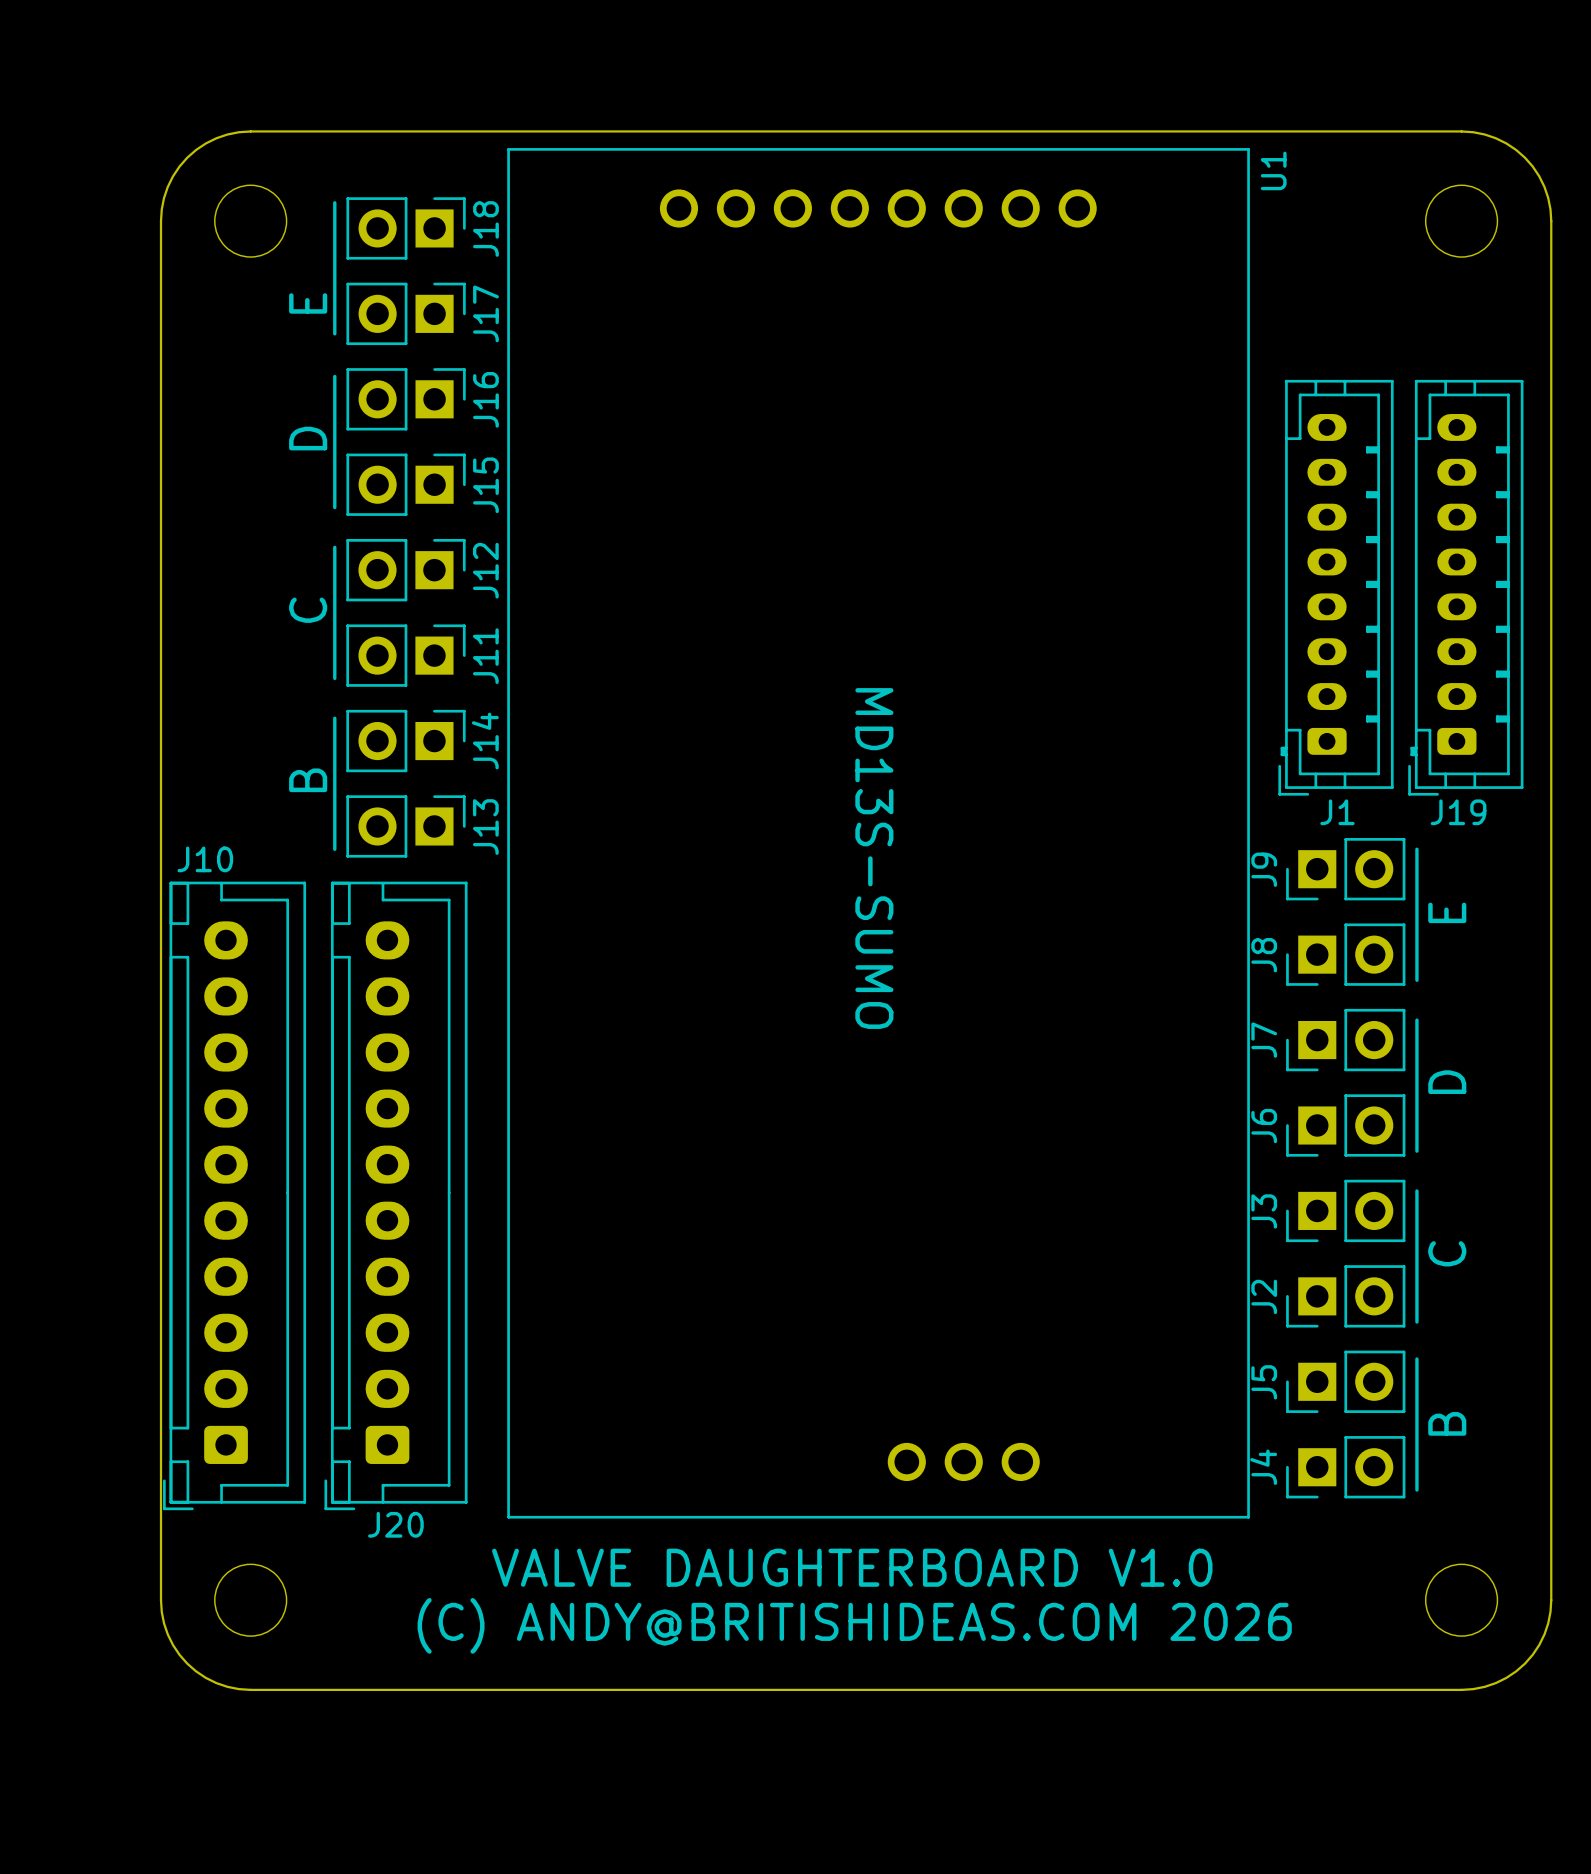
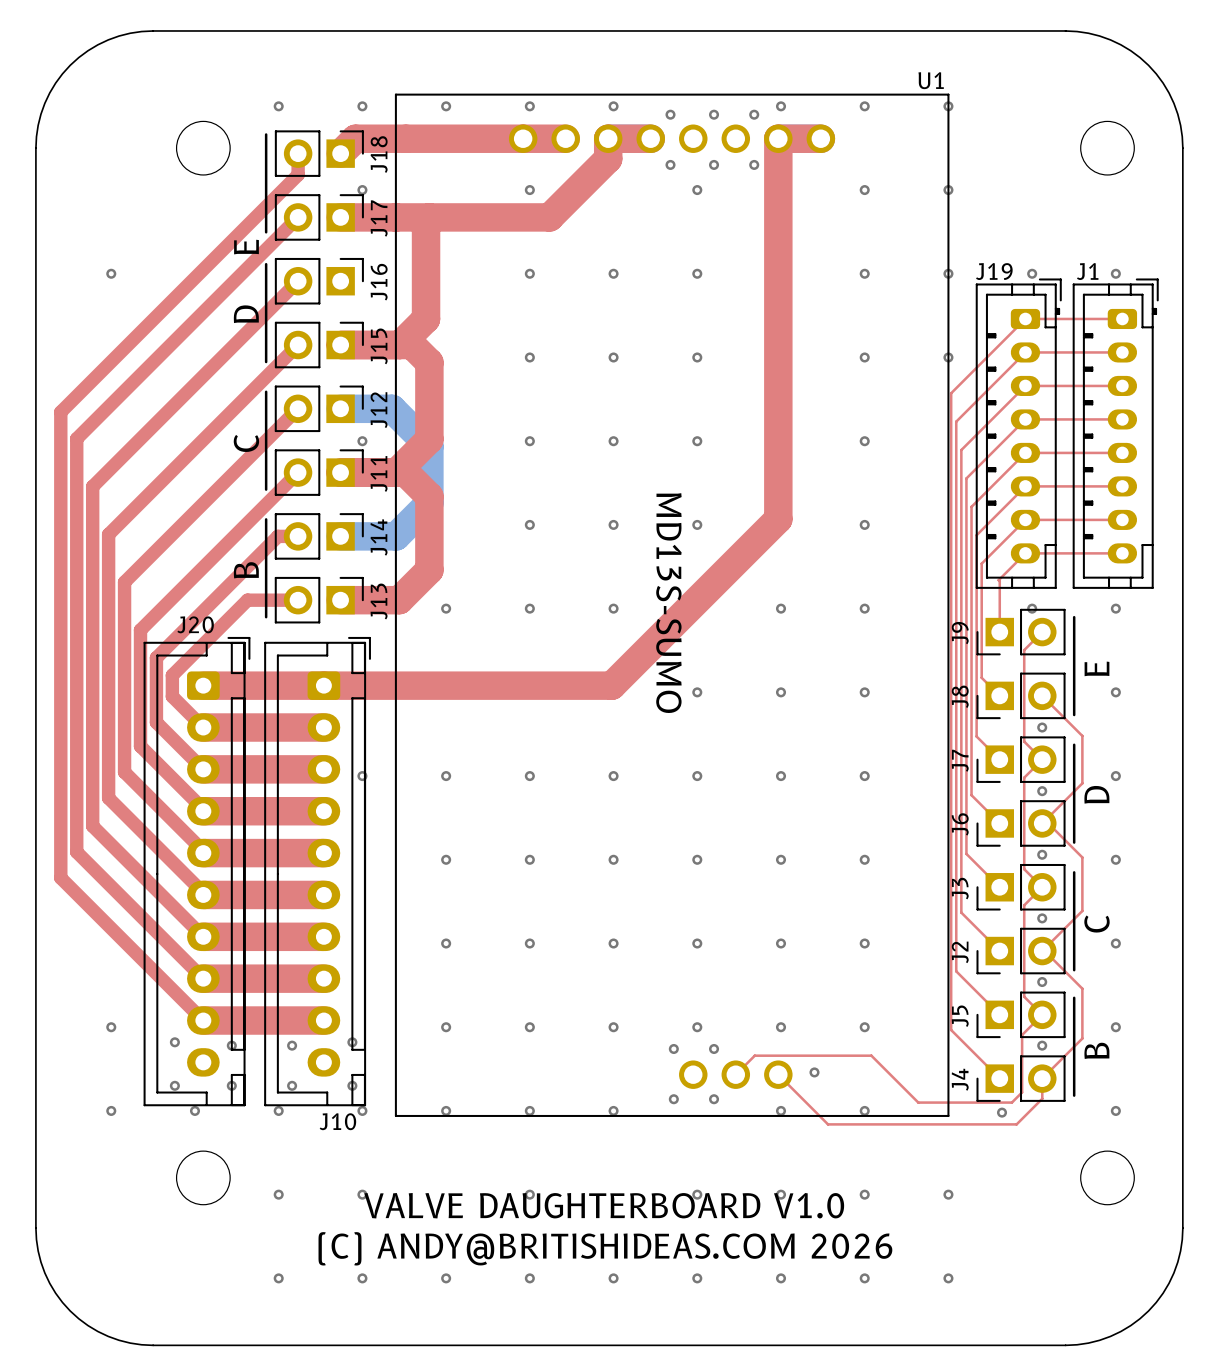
board edge: (250, 131) (1461, 131) (1473, 132) (1495, 138) (1516, 149) (1532, 166) (1539, 176) (1548, 197) (1551, 221) (1551, 1600) (1548, 1623) (1539, 1645) (1532, 1654) (1516, 1671) (1506, 1677) (1484, 1686) (1461, 1689) (250, 1689) (227, 1686) (216, 1683) (196, 1671) (179, 1654) (167, 1634) (164, 1623) (161, 1600) (161, 221) (164, 197) (167, 186) (179, 166) (187, 157) (196, 149) (216, 138) (227, 134) (250, 131) -> (153, 30) (130, 33) (108, 39) (88, 50) (70, 65) (49, 92) (40, 114) (36, 136) (35, 1228) (40, 1262) (49, 1283) (62, 1302) (78, 1318) (97, 1331) (119, 1340) (153, 1345) (1065, 1345) (1088, 1343) (1110, 1336) (1139, 1318) (1156, 1302) (1169, 1283) (1180, 1251) (1182, 1228) (1182, 148) (1177, 114) (1169, 92) (1156, 73) (1139, 57) (1110, 39) (1088, 33) (1065, 30) (153, 30)
via: none -> (278, 106)
via: none -> (362, 106)
via: none -> (446, 106)
via: none -> (529, 106)
via: none -> (613, 106)
via: none -> (781, 106)
via: none -> (864, 106)
via: none -> (948, 106)
U1 name rotation: 0° (1273, 170) -> 90° clockwise (931, 80)
U1 name position: U1 (1273, 170) -> U1 (931, 80)
via: none -> (670, 114)
via: none -> (714, 114)
via: none -> (754, 114)
top track: none -> (565, 138) (355, 138) (340, 153)
top track: none -> (650, 138) (608, 138) (608, 158) (549, 217) (340, 217)
top track: none -> (820, 138) (778, 138) (778, 519) (611, 685) (203, 685)
top track: none -> (298, 153) (298, 174) (60, 412) (60, 877) (203, 1020) (323, 1020)
via: none -> (670, 164)
via: none -> (714, 164)
via: none -> (754, 164)
via: none -> (362, 190)
via: none -> (529, 190)
via: none -> (697, 190)
via: none -> (864, 190)
via: none -> (948, 190)
text position: E (308, 303) -> E (246, 247)
top track: none -> (298, 217) (76, 438) (76, 852) (203, 978) (323, 978)
top track: none -> (429, 217) (426, 220) (426, 318) (400, 345)
via: none -> (111, 273)
via: none -> (529, 273)
via: none -> (613, 273)
via: none -> (697, 273)
via: none -> (864, 273)
via: none -> (948, 273)
via: none -> (1032, 273)
via: none -> (1115, 273)
top track: none -> (298, 281) (92, 486) (92, 826) (203, 936) (323, 936)
top track: none -> (1122, 318) (1025, 318) (951, 393) (951, 1030) (999, 1078)
top track: none -> (298, 345) (108, 534) (108, 798) (203, 894) (323, 894)
top track: none -> (340, 345) (411, 345) (429, 362) (429, 439) (396, 472)
top track: none -> (1122, 352) (1025, 352) (956, 421) (956, 971) (999, 1014)
via: none -> (529, 357)
via: none -> (613, 357)
via: none -> (697, 357)
via: none -> (864, 357)
via: none -> (948, 357)
top track: none -> (1122, 385) (1025, 385) (961, 450) (961, 912) (999, 951)
top track: none -> (298, 408) (124, 582) (124, 772) (203, 853) (323, 853)
bottom track: none -> (340, 408) (391, 408) (429, 446) (429, 503) (396, 536) (340, 536)
top track: none -> (1122, 419) (1025, 419) (966, 478) (966, 853) (999, 887)
J1 rotation: 0° (1336, 587) -> 180° (1115, 433)
J19 rotation: 0° (1465, 587) -> 180° (1018, 433)
via: none -> (362, 441)
via: none -> (529, 441)
via: none -> (613, 441)
via: none -> (697, 441)
via: none -> (864, 441)
top track: none -> (1122, 452) (1025, 452) (971, 506) (971, 795) (999, 823)
top track: none -> (298, 472) (140, 630) (140, 746) (203, 811) (323, 811)
top track: none -> (340, 472) (405, 472) (429, 496) (429, 570) (399, 600) (340, 600)
top track: none -> (1122, 486) (1025, 486) (976, 535) (976, 736) (999, 759)
top track: none -> (1122, 519) (1025, 519) (981, 563) (981, 677) (999, 695)
via: none -> (529, 524)
via: none -> (613, 524)
via: none -> (697, 524)
via: none -> (864, 524)
top track: none -> (298, 536) (277, 536) (156, 657) (156, 722) (203, 769) (323, 769)
top track: none -> (1122, 553) (1025, 553) (998, 580) (999, 632)
top track: none -> (298, 600) (247, 600) (172, 675) (172, 696) (203, 727) (323, 727)
via: none -> (446, 608)
via: none -> (529, 608)
via: none -> (613, 608)
via: none -> (781, 608)
via: none -> (864, 608)
via: none -> (1032, 608)
via: none -> (1115, 608)
top track: none -> (1042, 632) (1024, 650) (1024, 741) (1042, 759) (1024, 777) (1024, 869) (1042, 887) (1024, 905) (1024, 996) (1042, 1014) (1022, 1035) (1022, 1092) (1011, 1102) (918, 1102) (871, 1055) (754, 1055) (735, 1074)
via: none -> (697, 692)
via: none -> (781, 692)
via: none -> (864, 692)
via: none -> (1115, 692)
top track: none -> (1042, 695) (1082, 735) (1082, 783) (1042, 823) (1048, 823) (1082, 857) (1082, 910) (1042, 951) (1044, 951) (1082, 988) (1082, 1038) (1042, 1078) (1042, 1098) (1016, 1124) (828, 1124) (778, 1074)
via: none -> (1042, 727)
via: none -> (362, 776)
via: none -> (446, 776)
via: none -> (529, 776)
via: none -> (613, 776)
via: none -> (697, 776)
via: none -> (781, 776)
via: none -> (864, 776)
via: none -> (1115, 776)
via: none -> (1042, 791)
via: none -> (1042, 854)
via: none -> (446, 859)
via: none -> (529, 859)
via: none -> (613, 859)
via: none -> (697, 859)
via: none -> (781, 859)
via: none -> (864, 859)
via: none -> (1115, 859)
J10 rotation: 0° (234, 1195) -> 180° (317, 871)
J20 rotation: 0° (396, 1195) -> 180° (196, 871)
via: none -> (1042, 918)
via: none -> (446, 943)
via: none -> (529, 943)
via: none -> (613, 943)
via: none -> (697, 943)
via: none -> (781, 943)
via: none -> (864, 943)
via: none -> (1115, 943)
via: none -> (1042, 982)
via: none -> (111, 1027)
via: none -> (446, 1027)
via: none -> (529, 1027)
via: none -> (613, 1027)
via: none -> (697, 1027)
via: none -> (781, 1027)
via: none -> (864, 1027)
via: none -> (1115, 1027)
via: none -> (174, 1042)
via: none -> (352, 1042)
via: none -> (231, 1045)
via: none -> (292, 1045)
via: none -> (1042, 1045)
via: none -> (673, 1048)
via: none -> (714, 1048)
via: none -> (814, 1072)
via: none -> (174, 1085)
via: none -> (231, 1085)
via: none -> (292, 1085)
via: none -> (352, 1085)
via: none -> (673, 1099)
via: none -> (714, 1099)
via: none -> (111, 1110)
via: none -> (194, 1110)
via: none -> (278, 1110)
via: none -> (362, 1110)
via: none -> (446, 1110)
via: none -> (529, 1110)
via: none -> (613, 1110)
via: none -> (781, 1110)
via: none -> (864, 1110)
via: none -> (1115, 1110)
via: none -> (1002, 1112)
text position: VALVE DAUGHTERBOARD V1.0 (852, 1567) -> VALVE DAUGHTERBOARD V1.0 (604, 1205)
via: none -> (278, 1194)
via: none -> (362, 1194)
via: none -> (529, 1194)
via: none -> (697, 1194)
via: none -> (781, 1194)
via: none -> (864, 1194)
via: none -> (948, 1194)
text position: (C) ANDY@BRITISHIDEAS.COM 2026 (854, 1625) -> (C) ANDY@BRITISHIDEAS.COM 2026 (605, 1248)
via: none -> (278, 1278)
via: none -> (362, 1278)
via: none -> (446, 1278)
via: none -> (529, 1278)
via: none -> (613, 1278)
via: none -> (697, 1278)
via: none -> (781, 1278)
via: none -> (864, 1278)
via: none -> (948, 1278)

